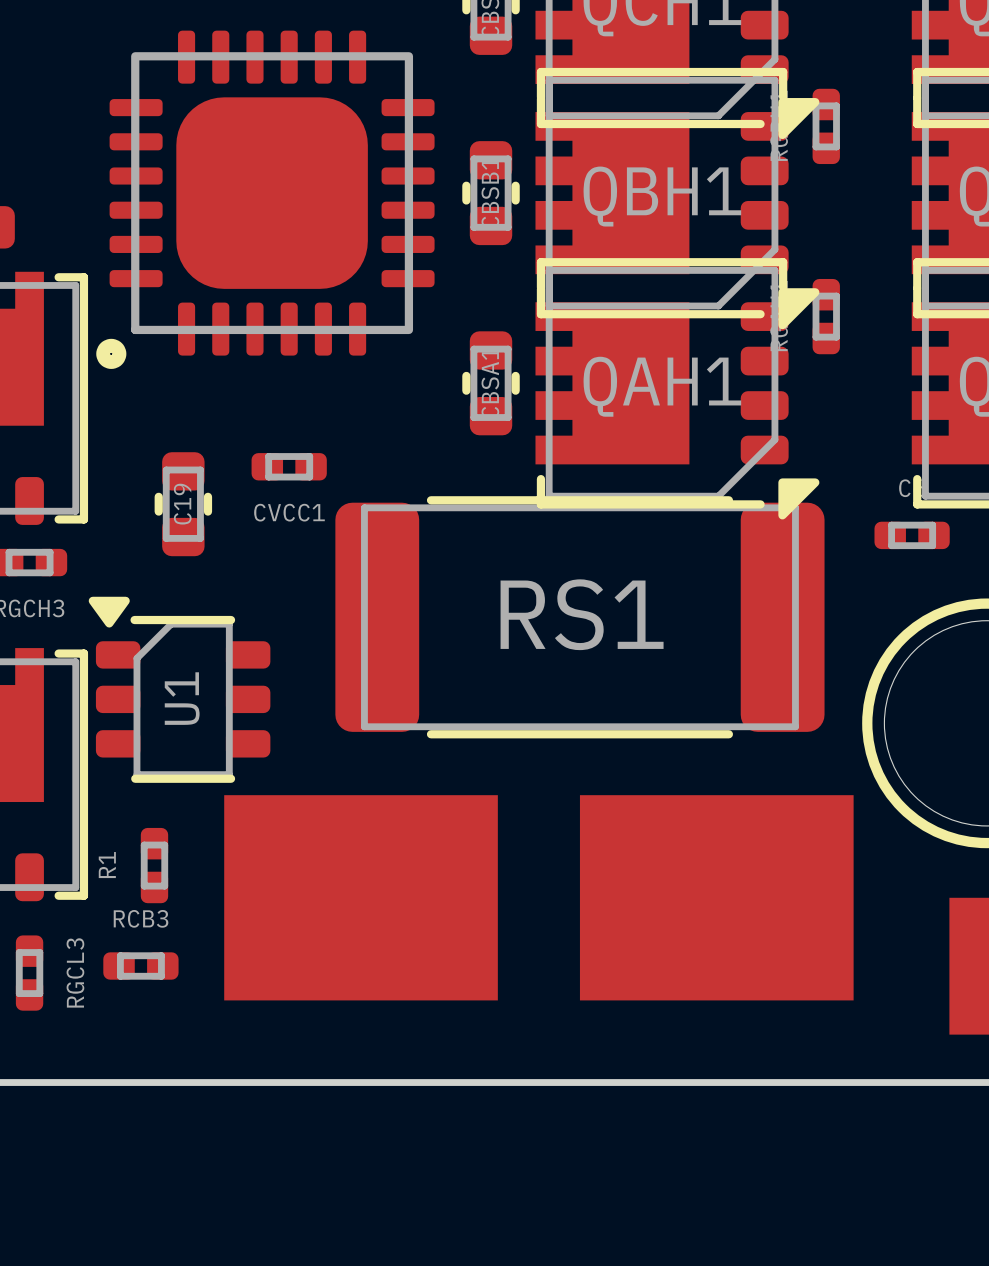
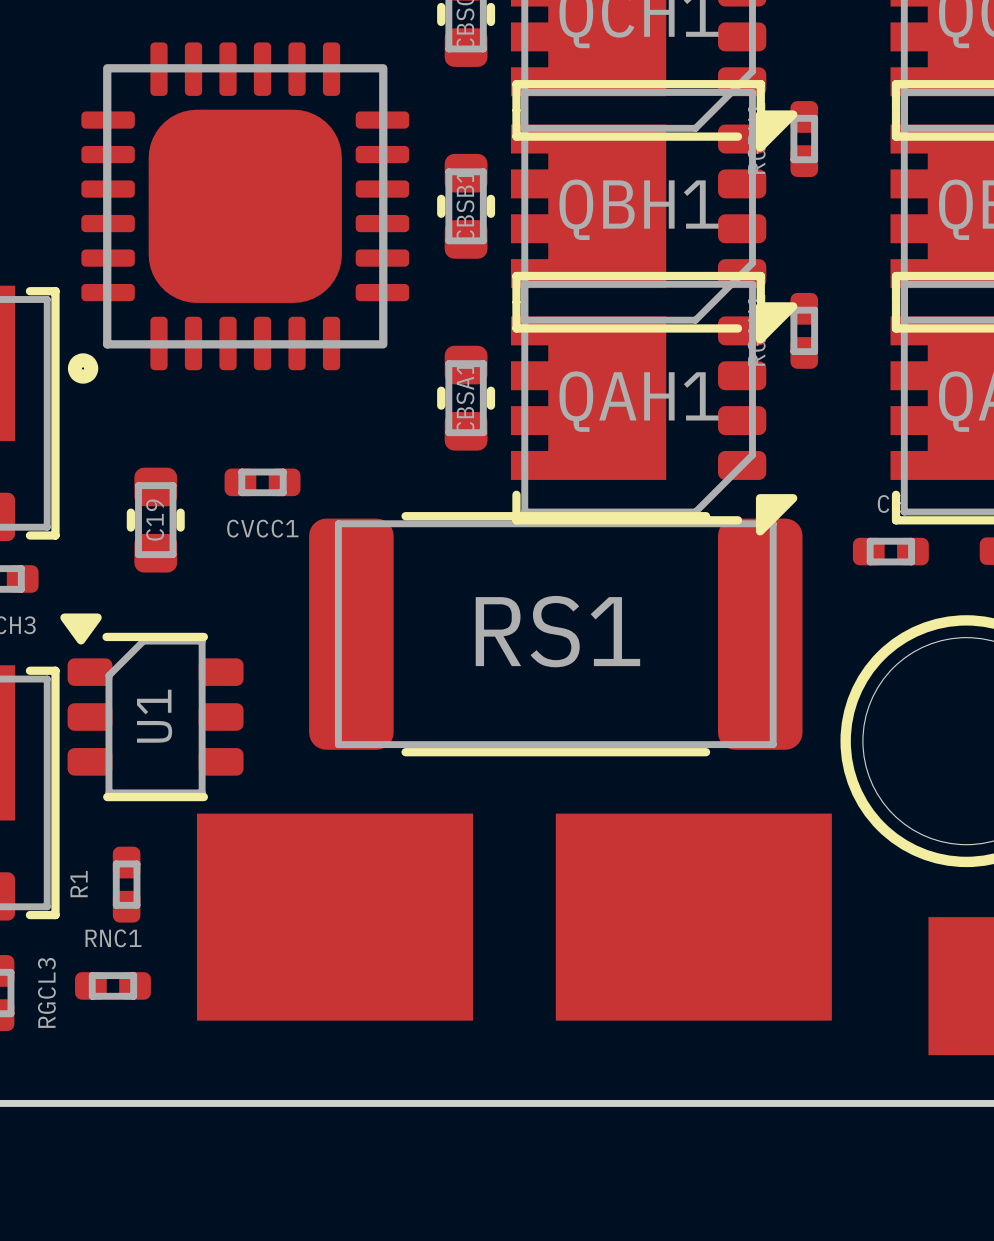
RCB3 name: RCB3 (141, 918) -> RNC1 (113, 938)

